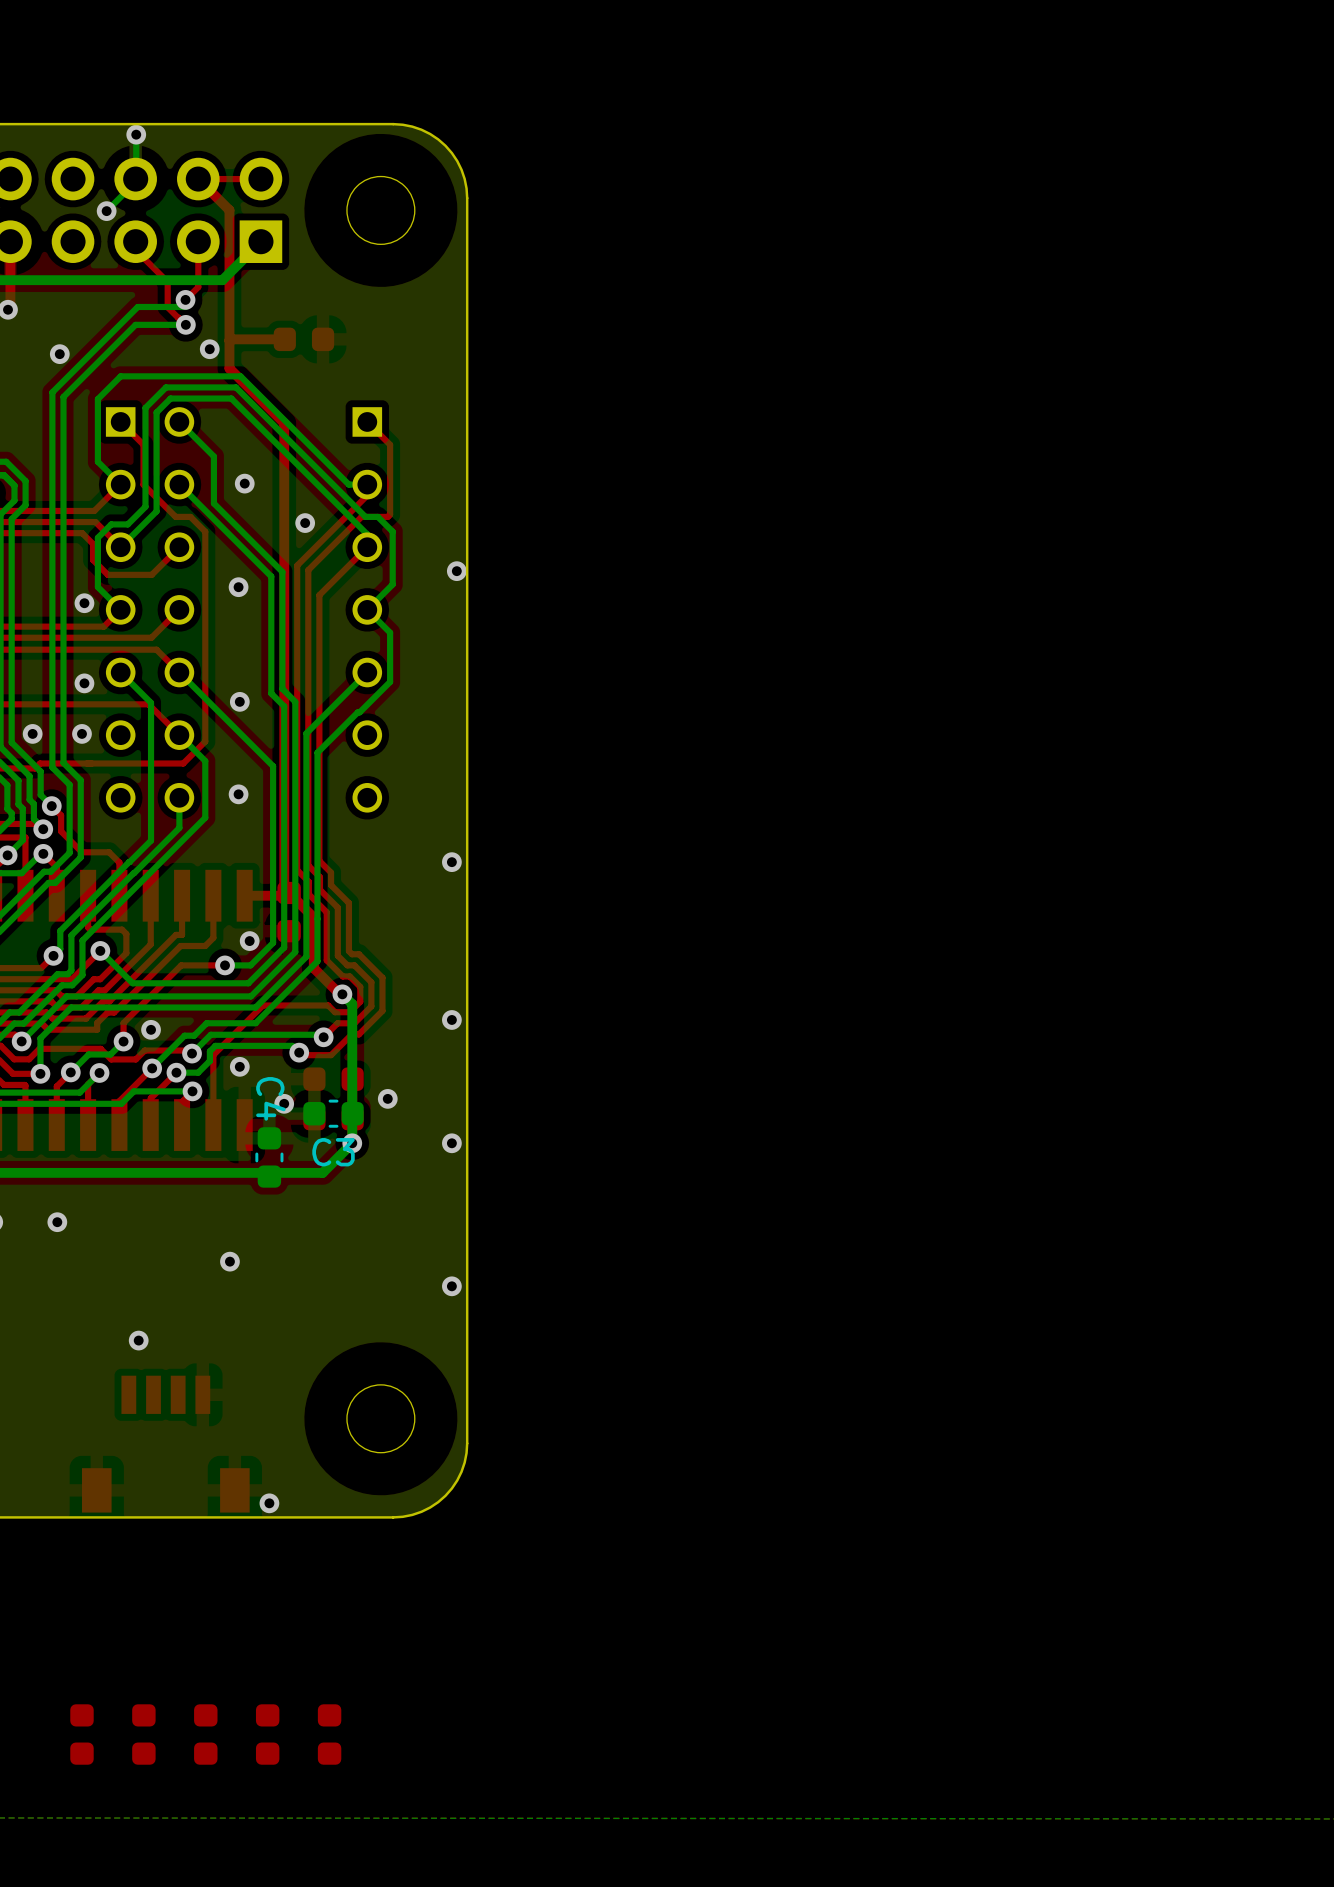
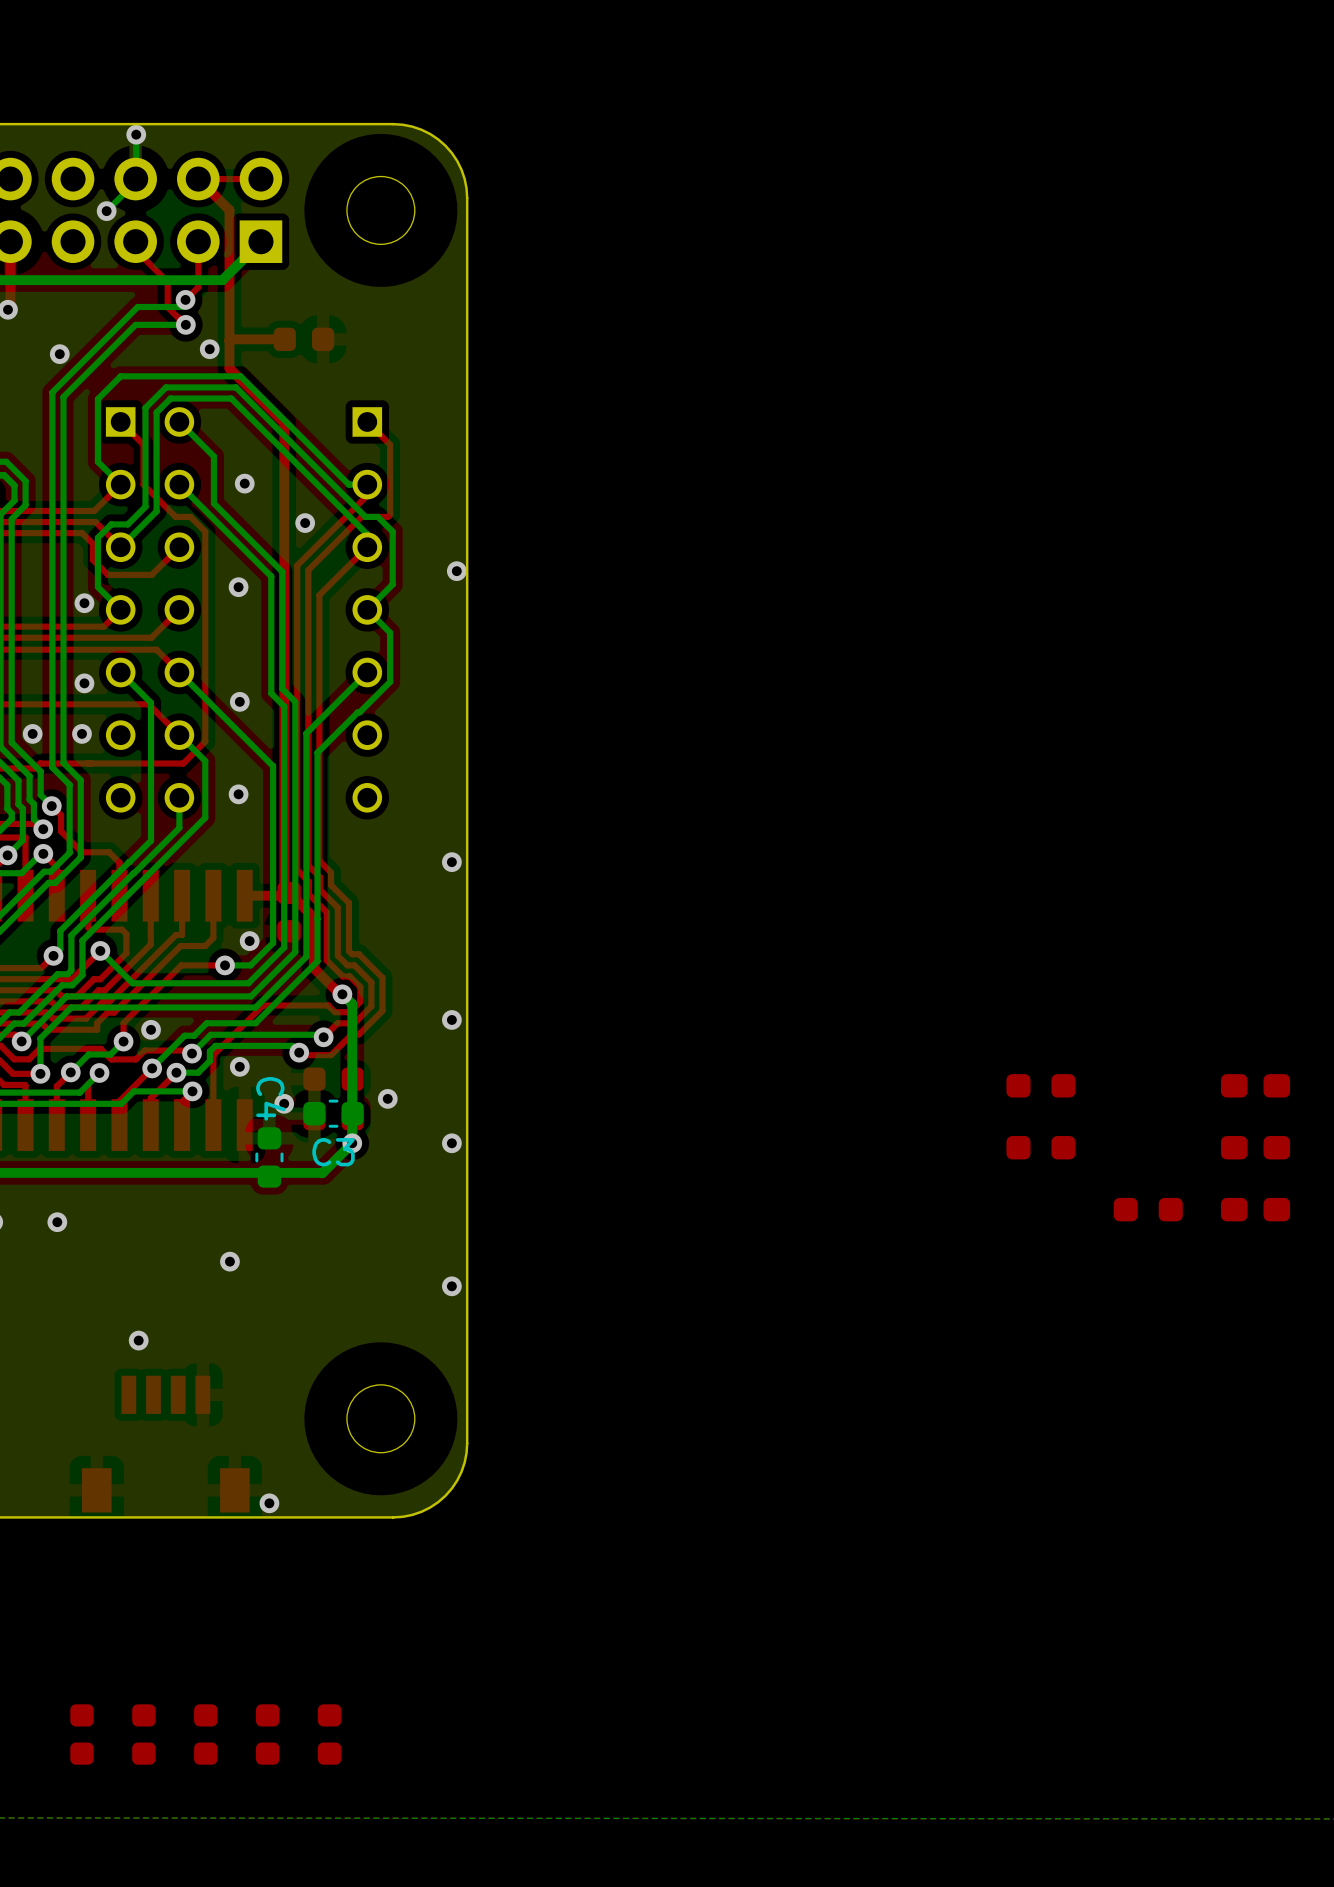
part: none -> (1040, 1085)
part: none -> (1255, 1085)
part: none -> (1040, 1147)
part: none -> (1255, 1147)
part: none -> (1148, 1209)
part: none -> (1255, 1209)

